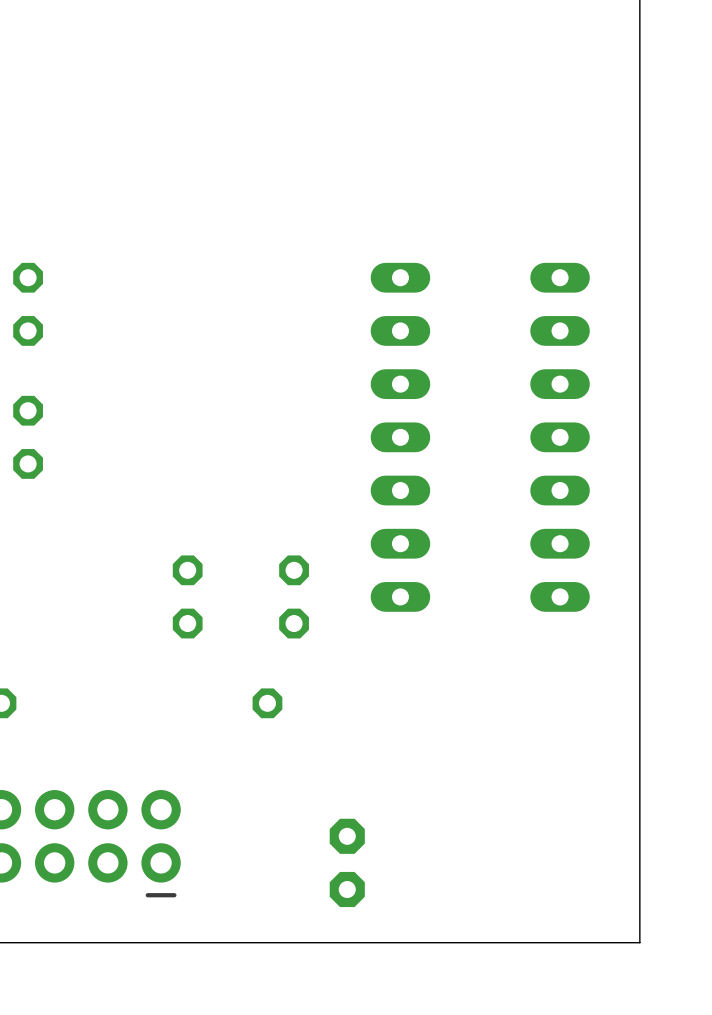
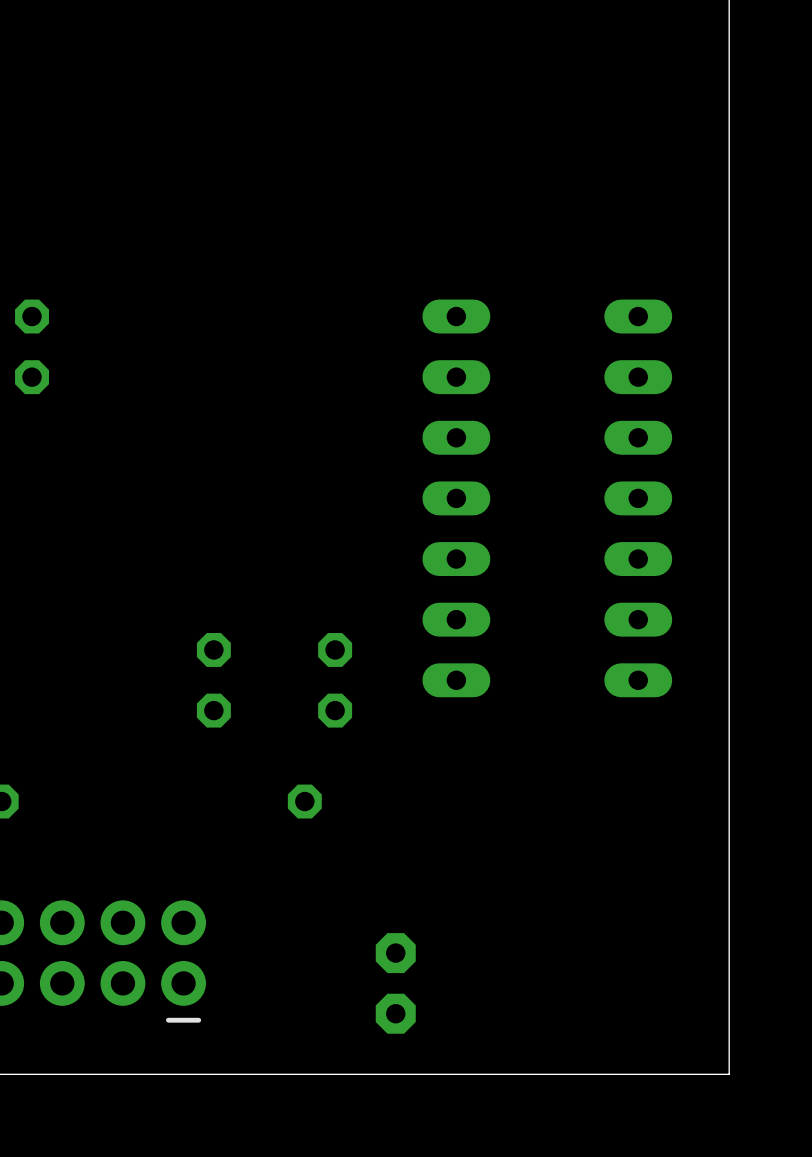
part: (28, 437) -> none

